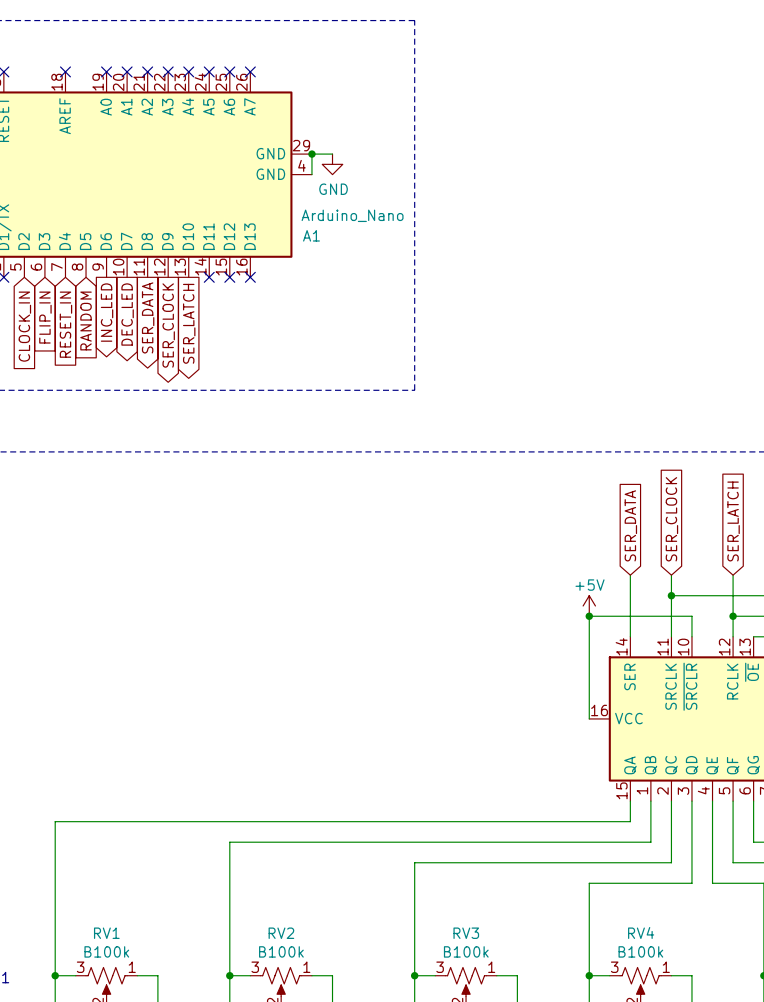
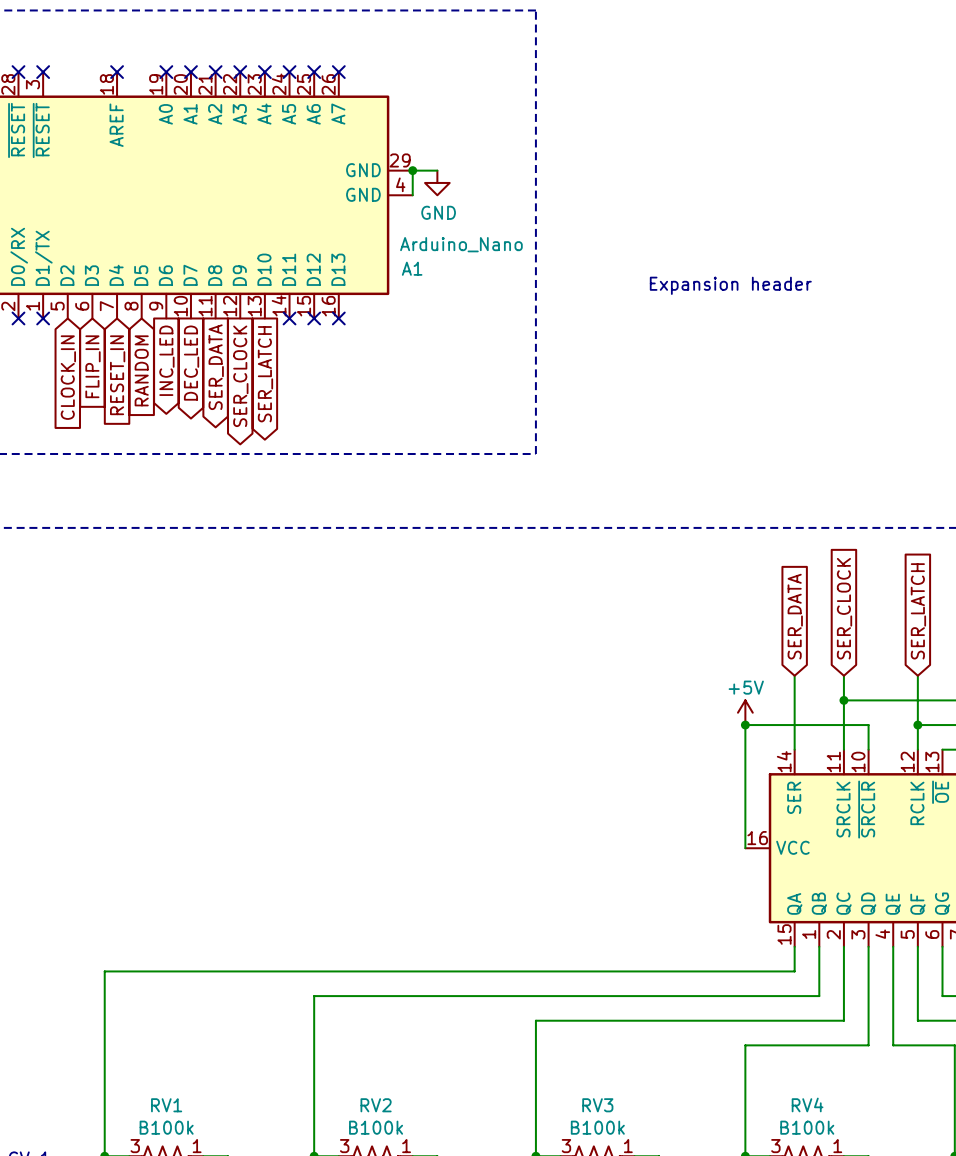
text: none -> Expansion header (730, 285)

